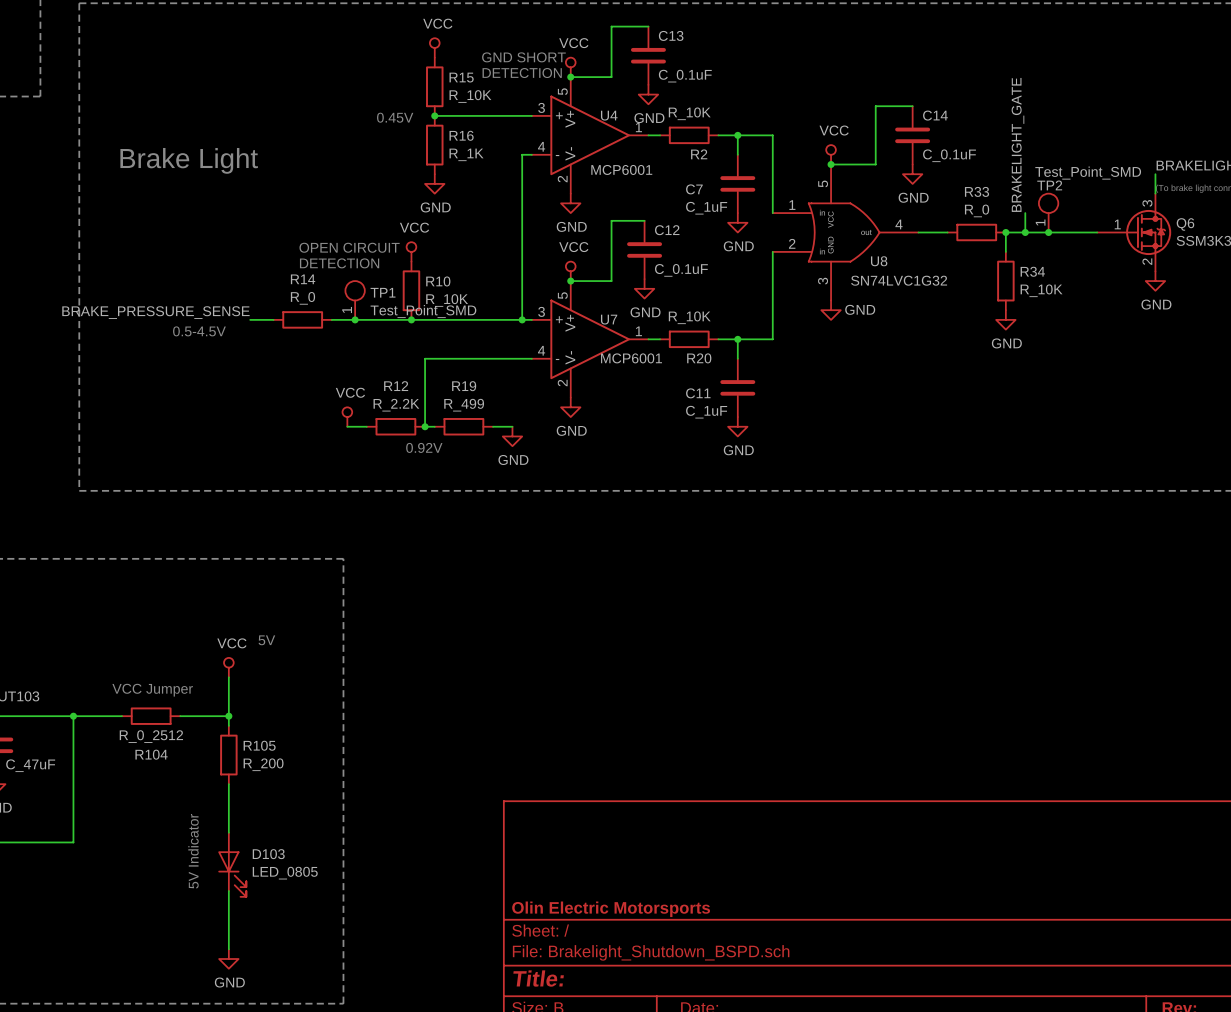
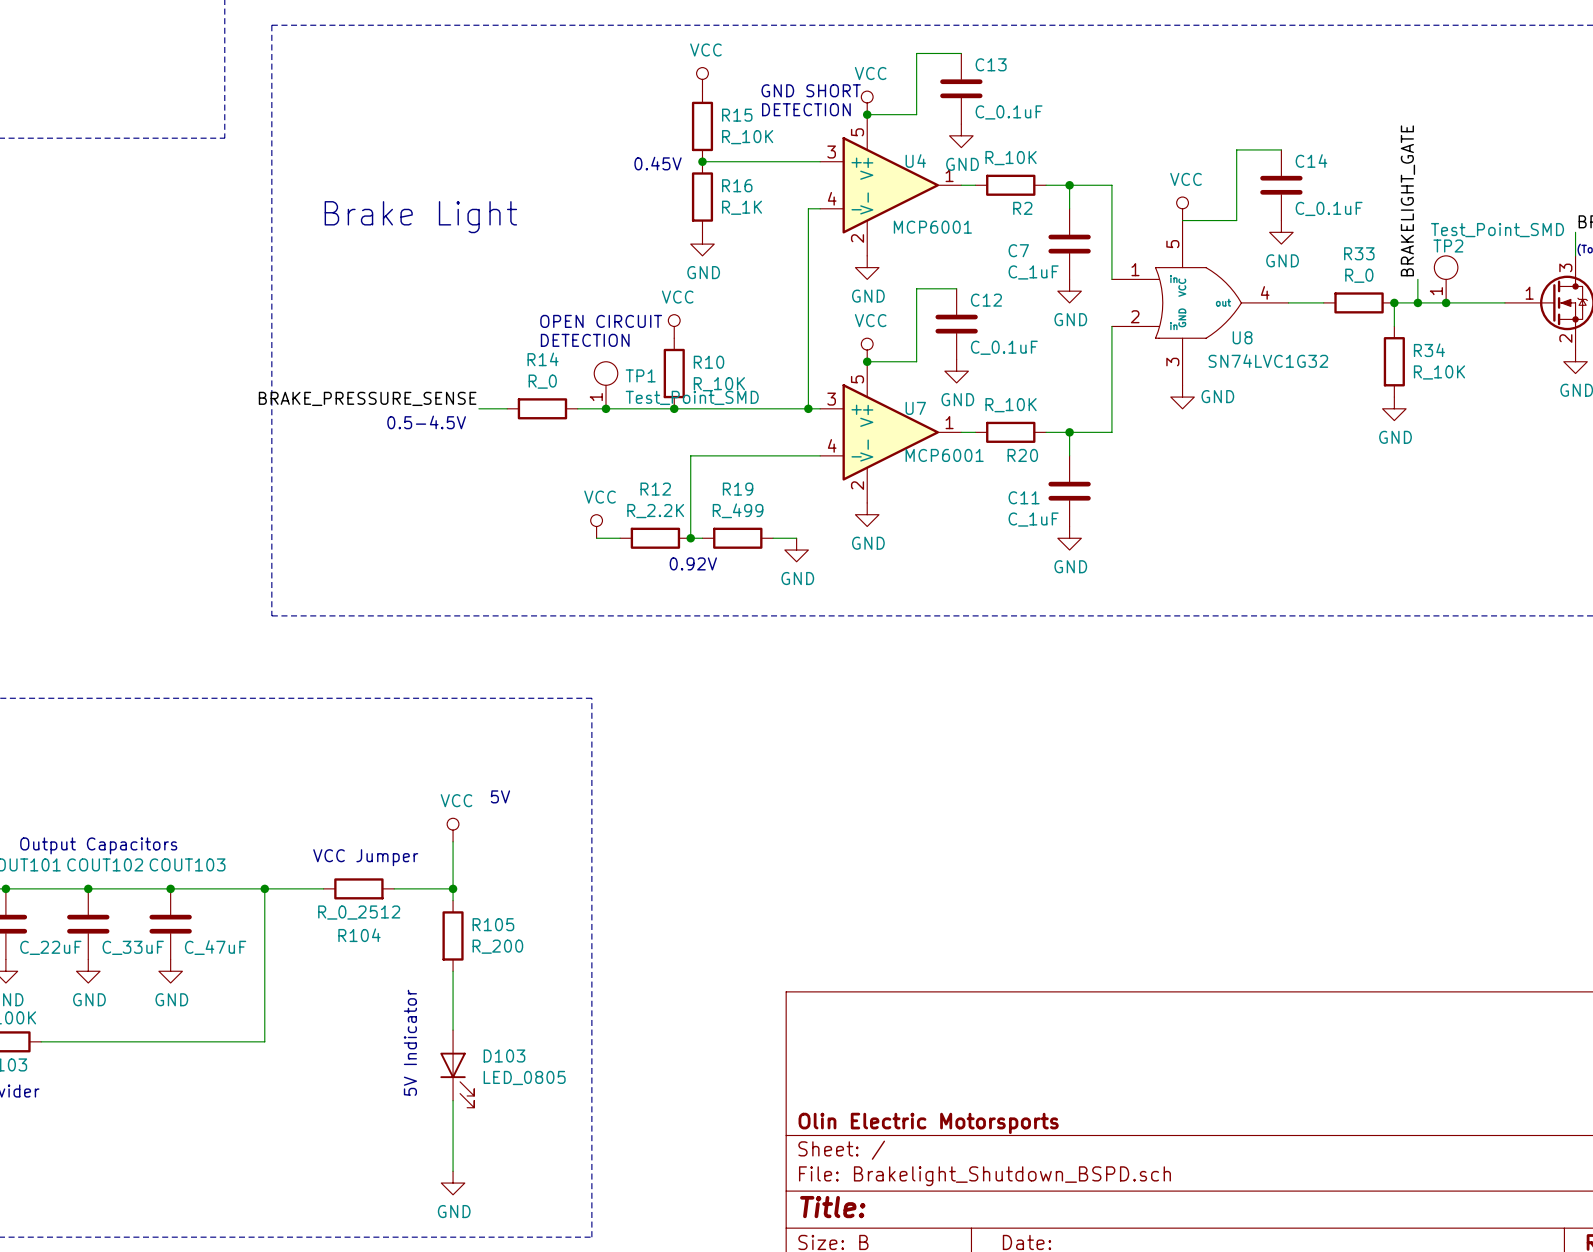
junction: (831, 164) -> none

